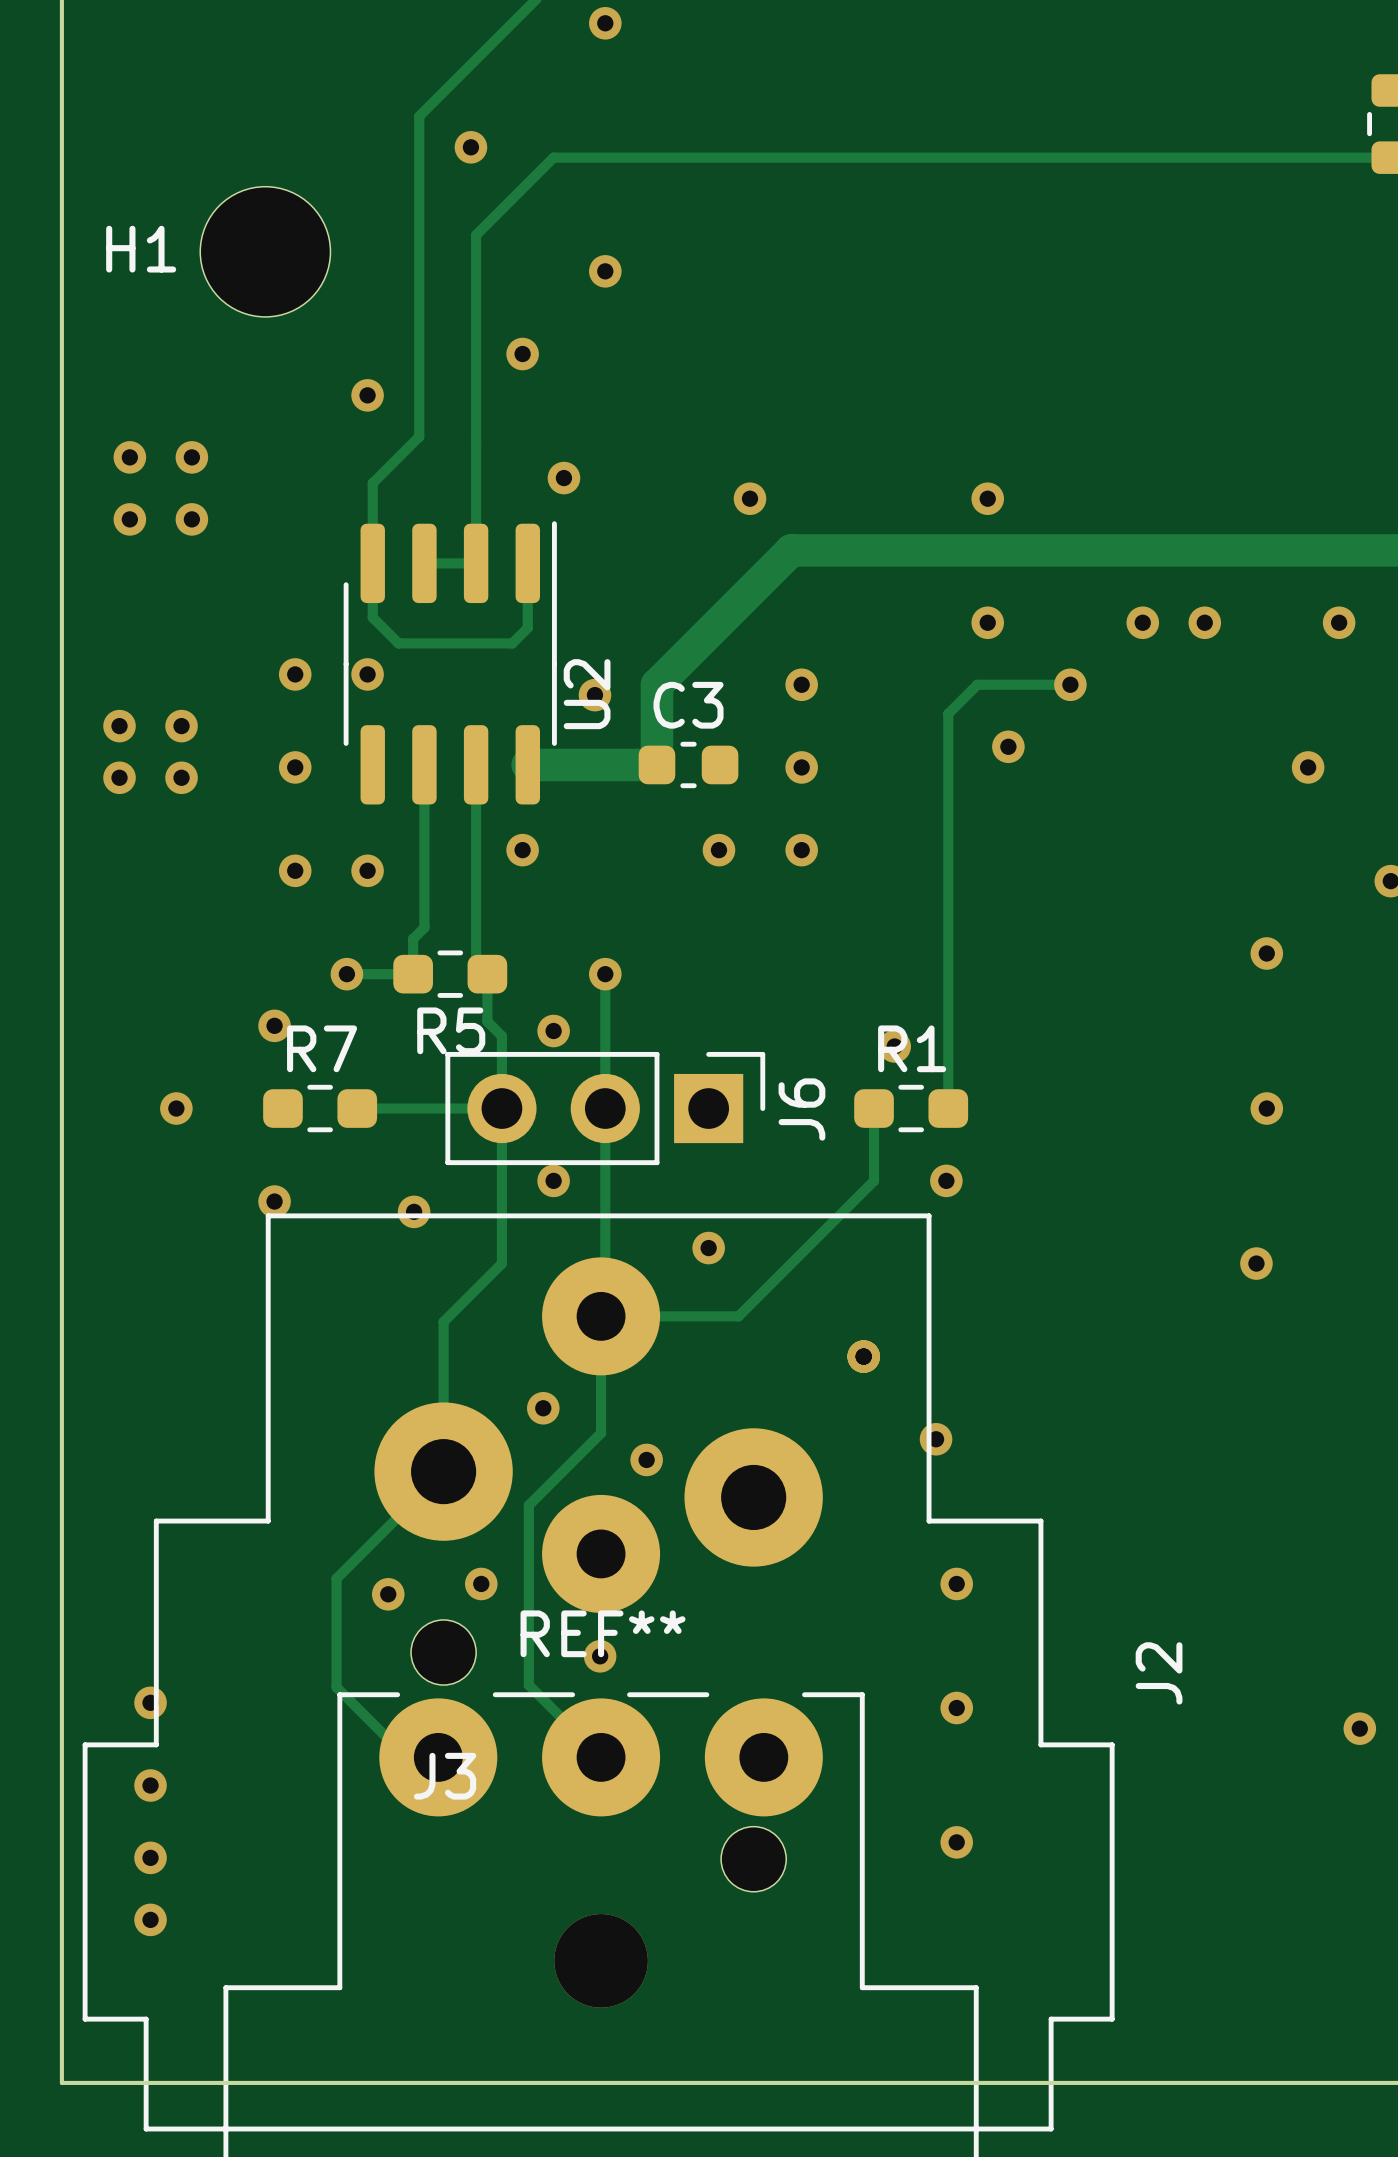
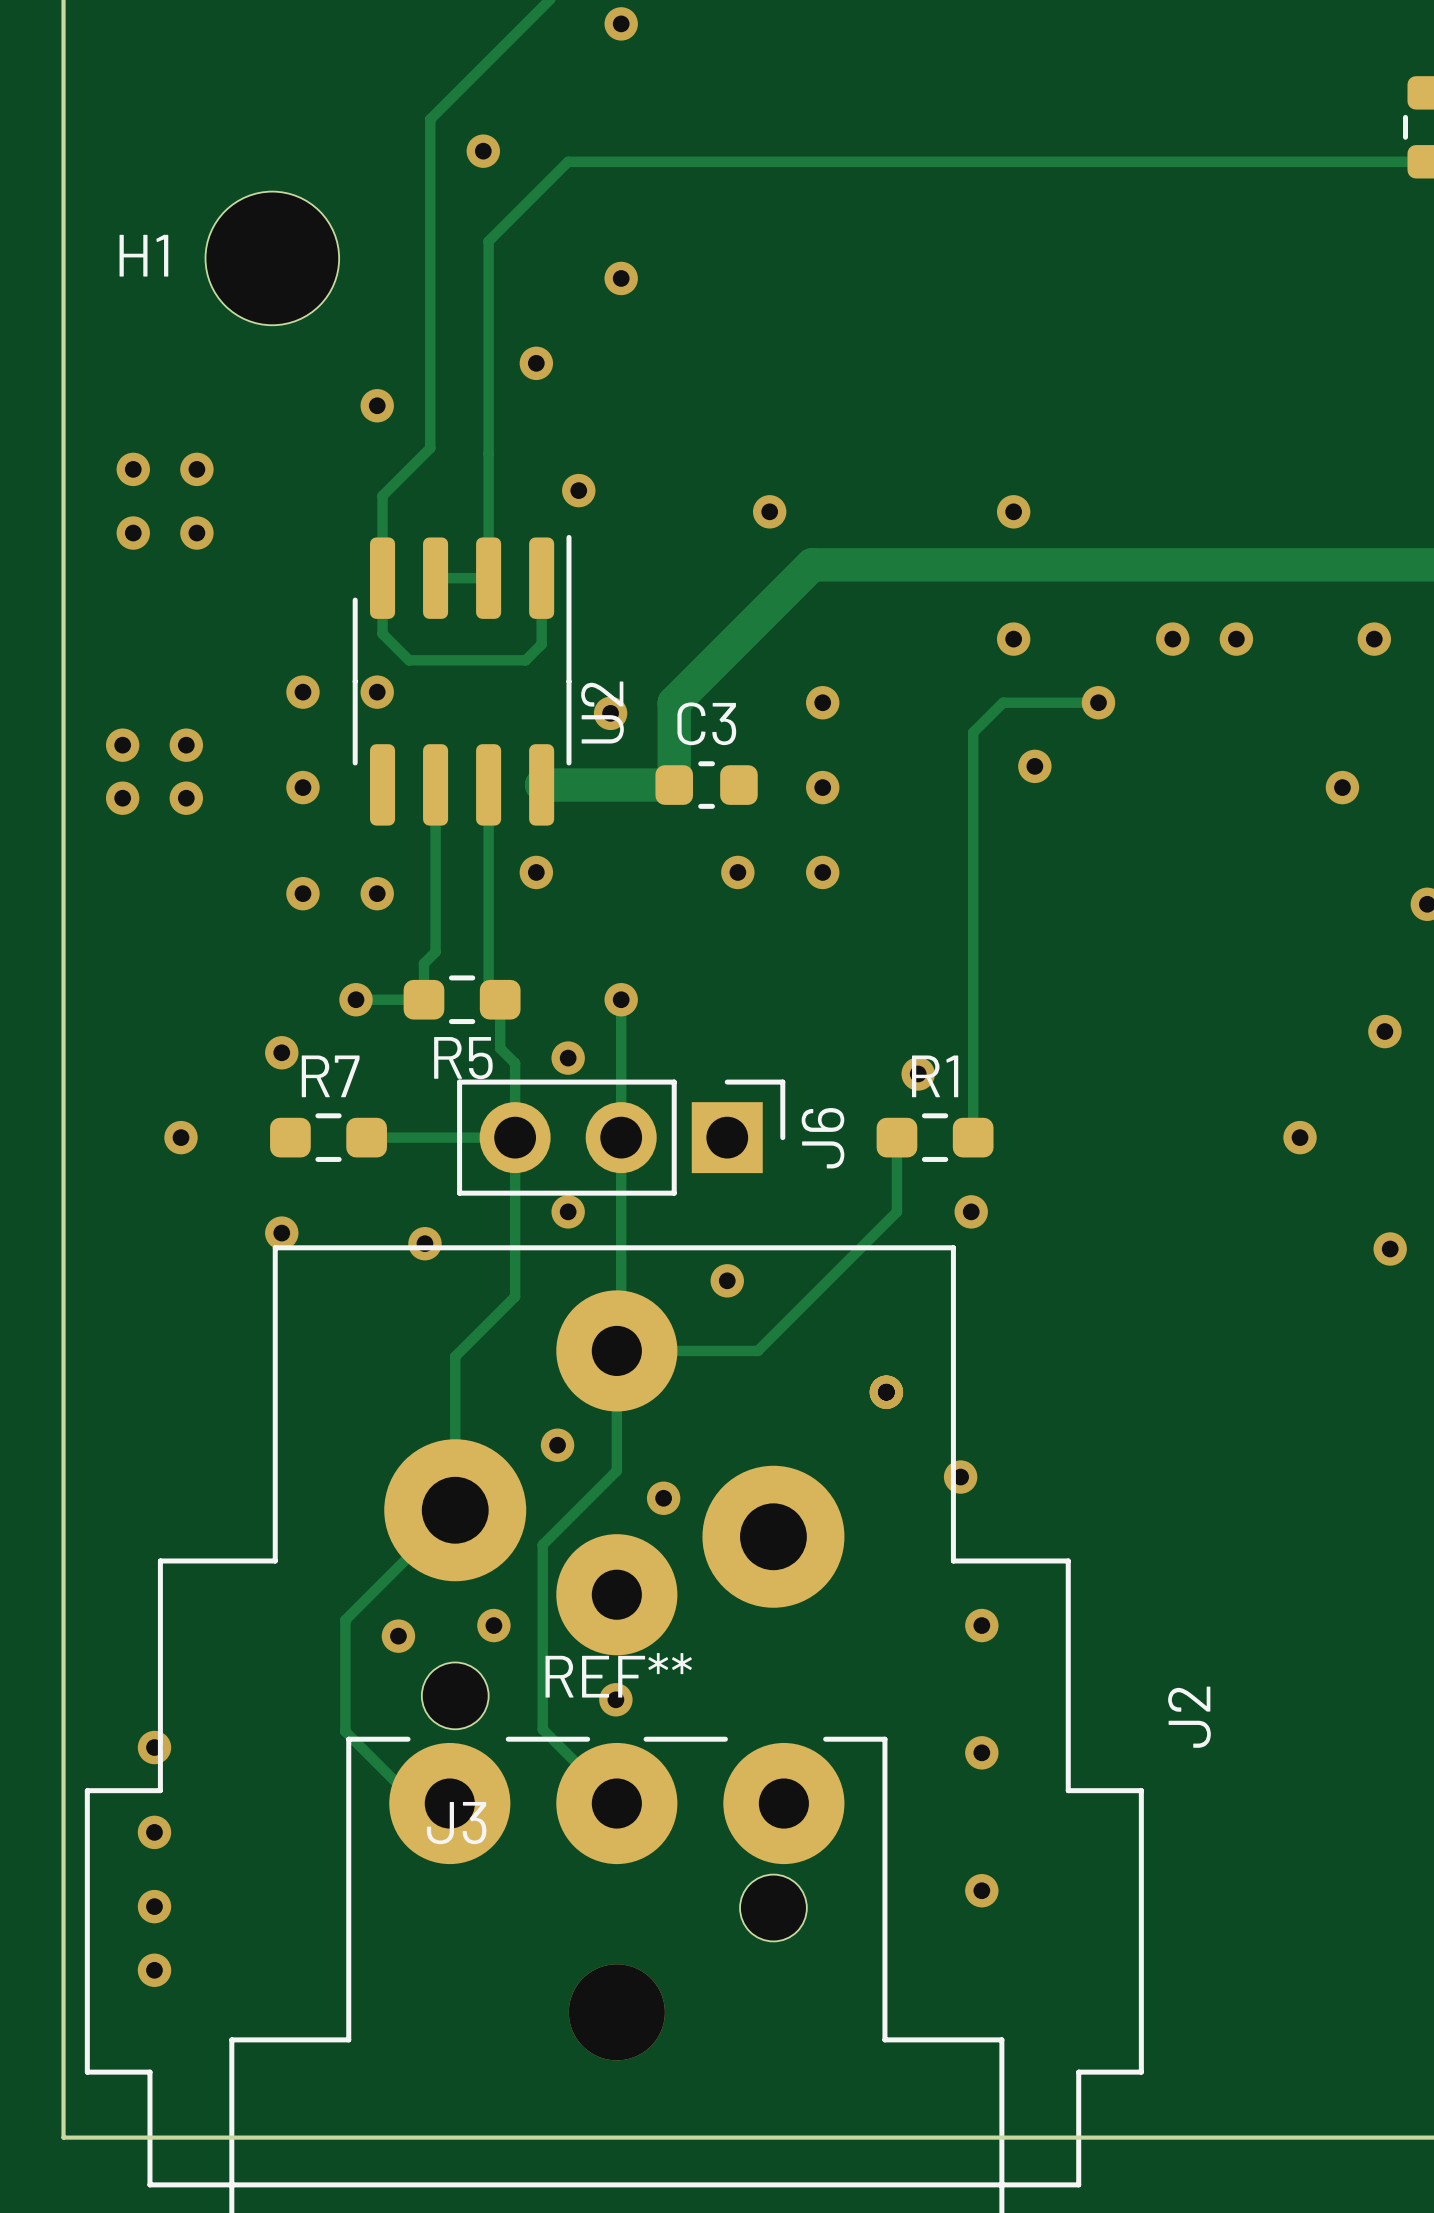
via position: (1266, 953) -> (1384, 1031)
via position: (1256, 1263) -> (1390, 1249)
via: (1359, 1728) -> none

